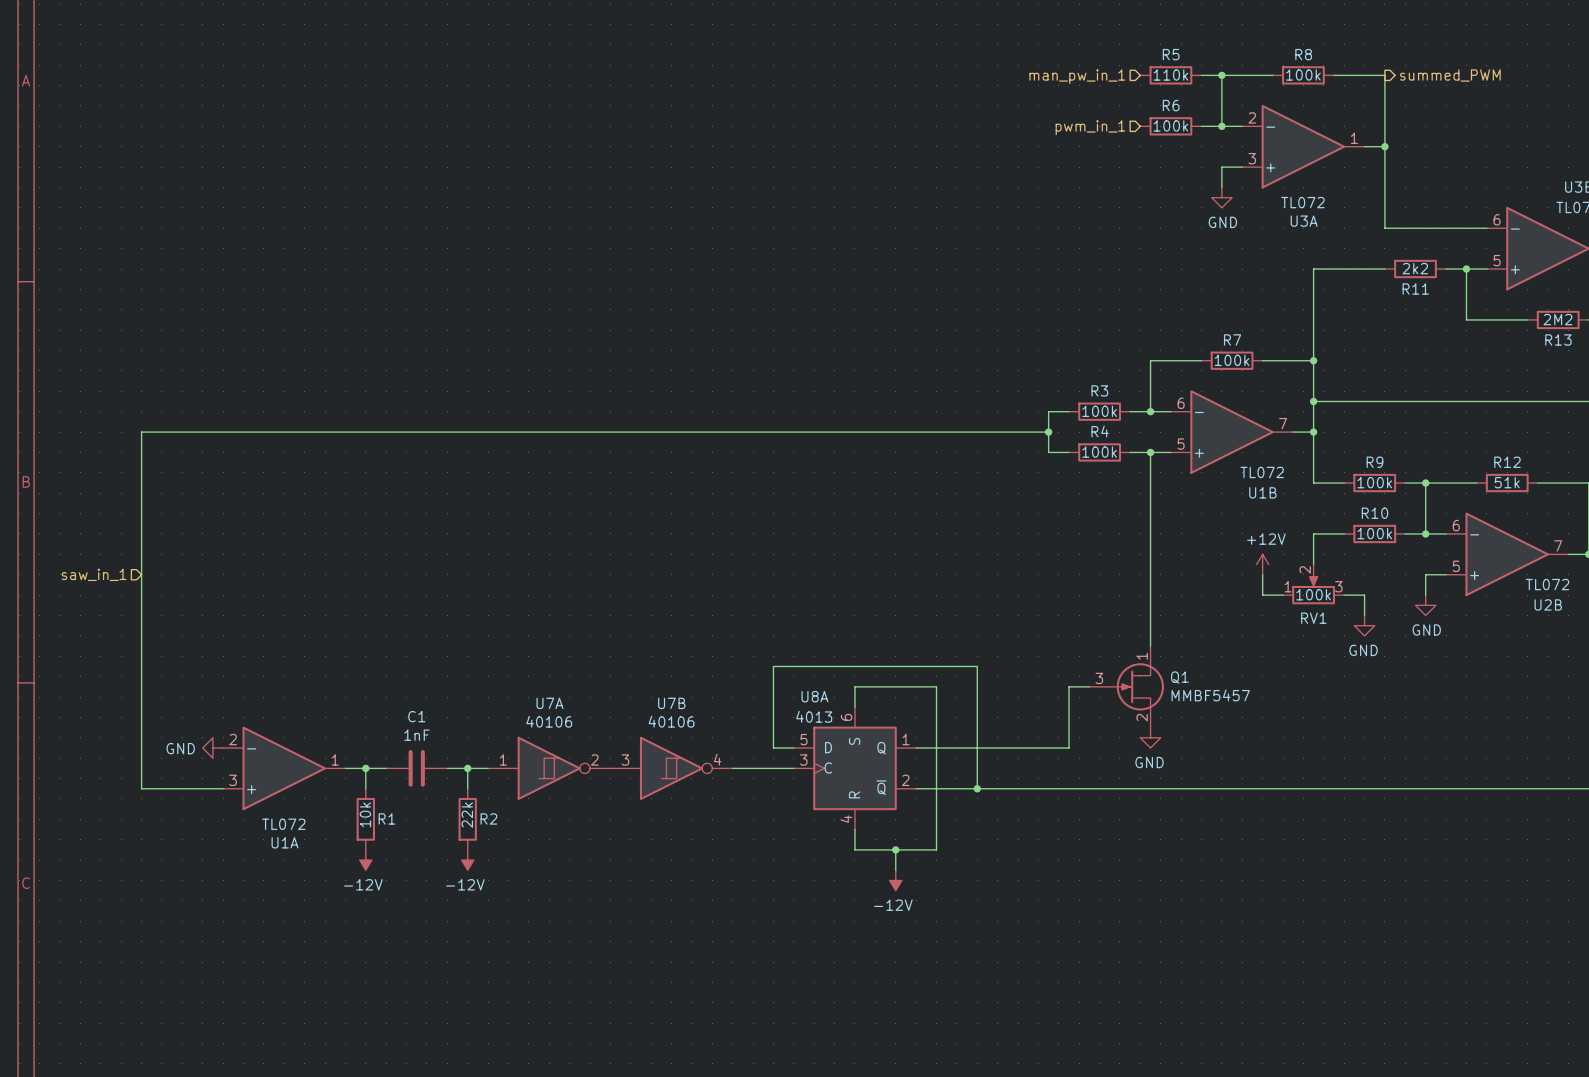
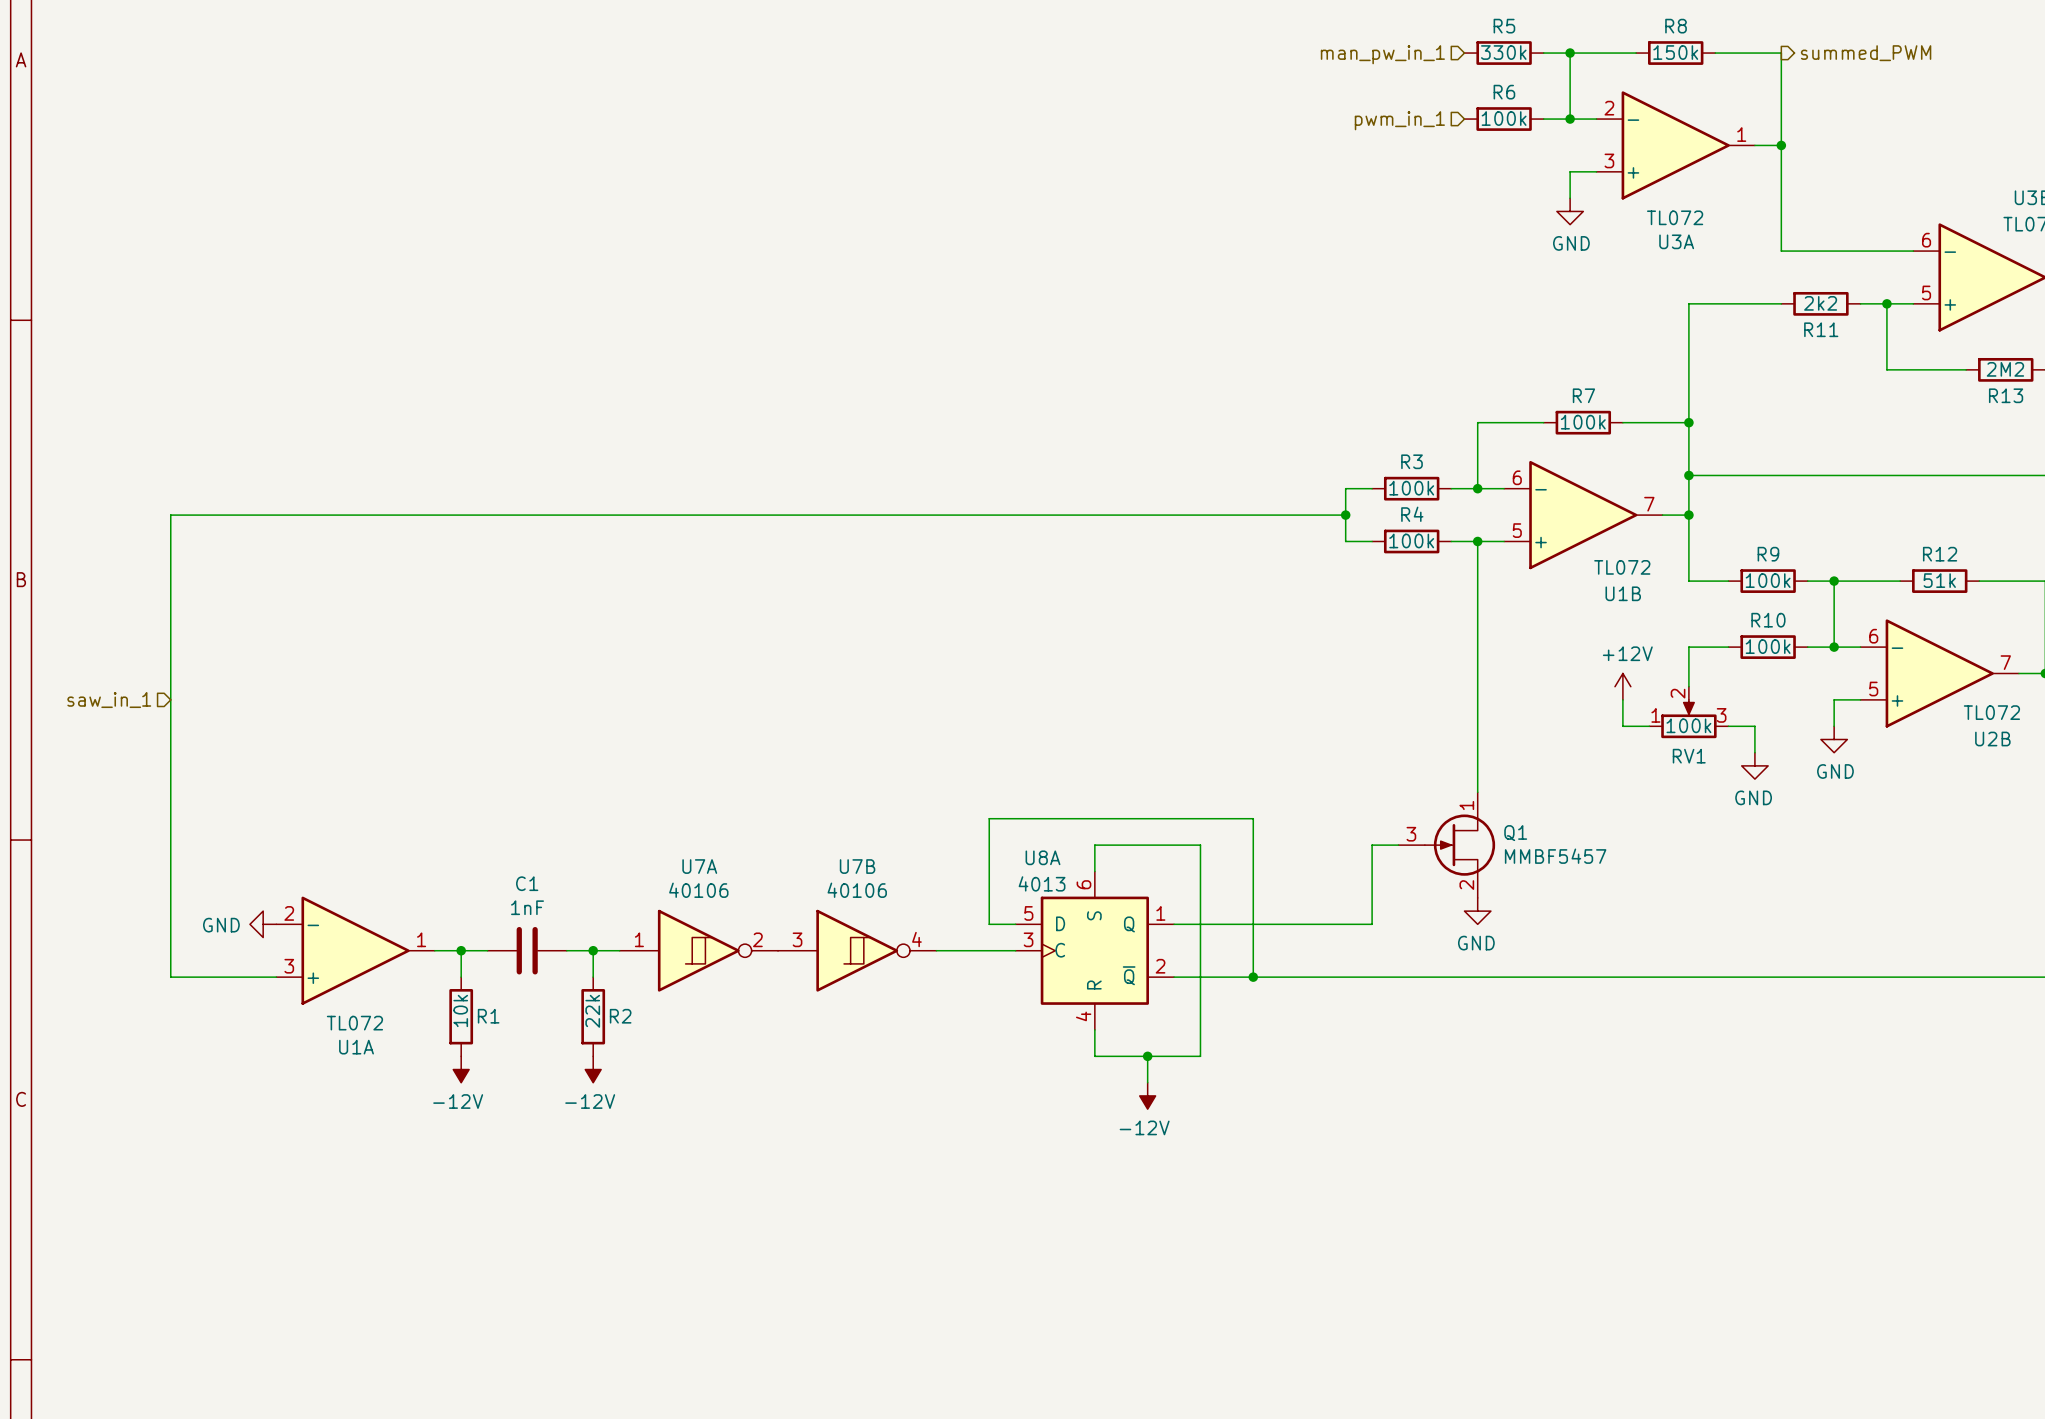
R5 value: 110k (1170, 74) -> 330k (1503, 52)
R8 value: 100k (1303, 74) -> 150k (1675, 52)

